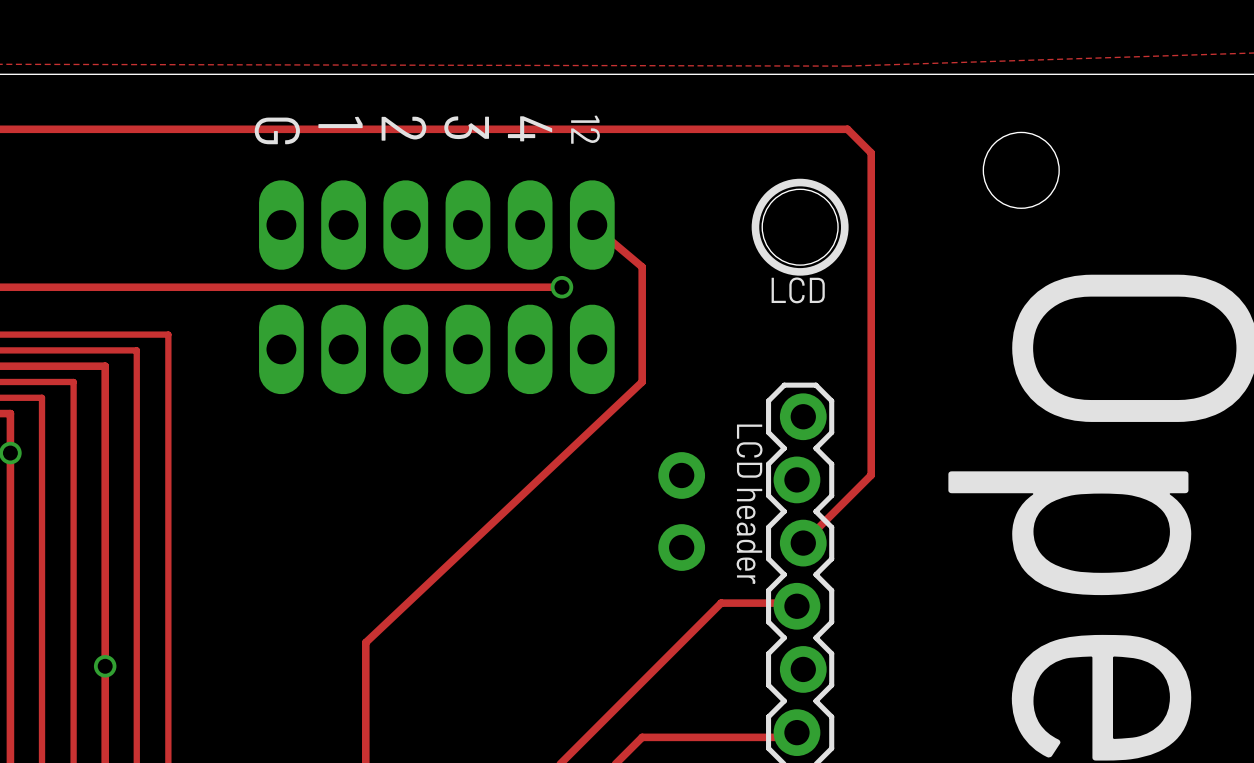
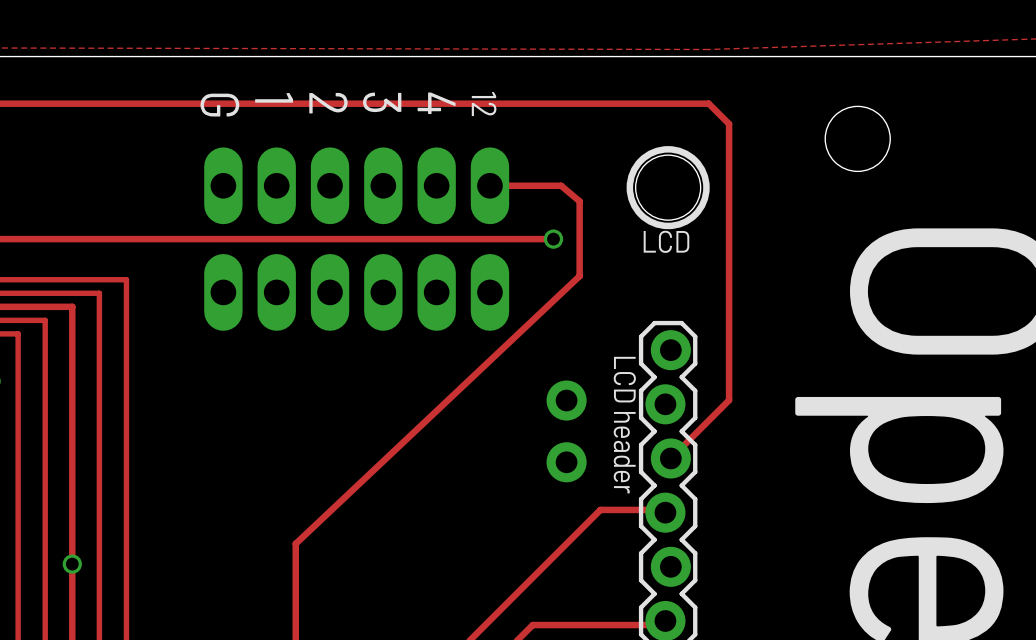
track: (592, 225) (642, 267) (642, 381) -> (489, 185) (561, 185) (579, 201) (579, 276) (532, 320)
track: none -> (463, 239) (553, 239)
via position: (561, 287) -> (553, 239)

